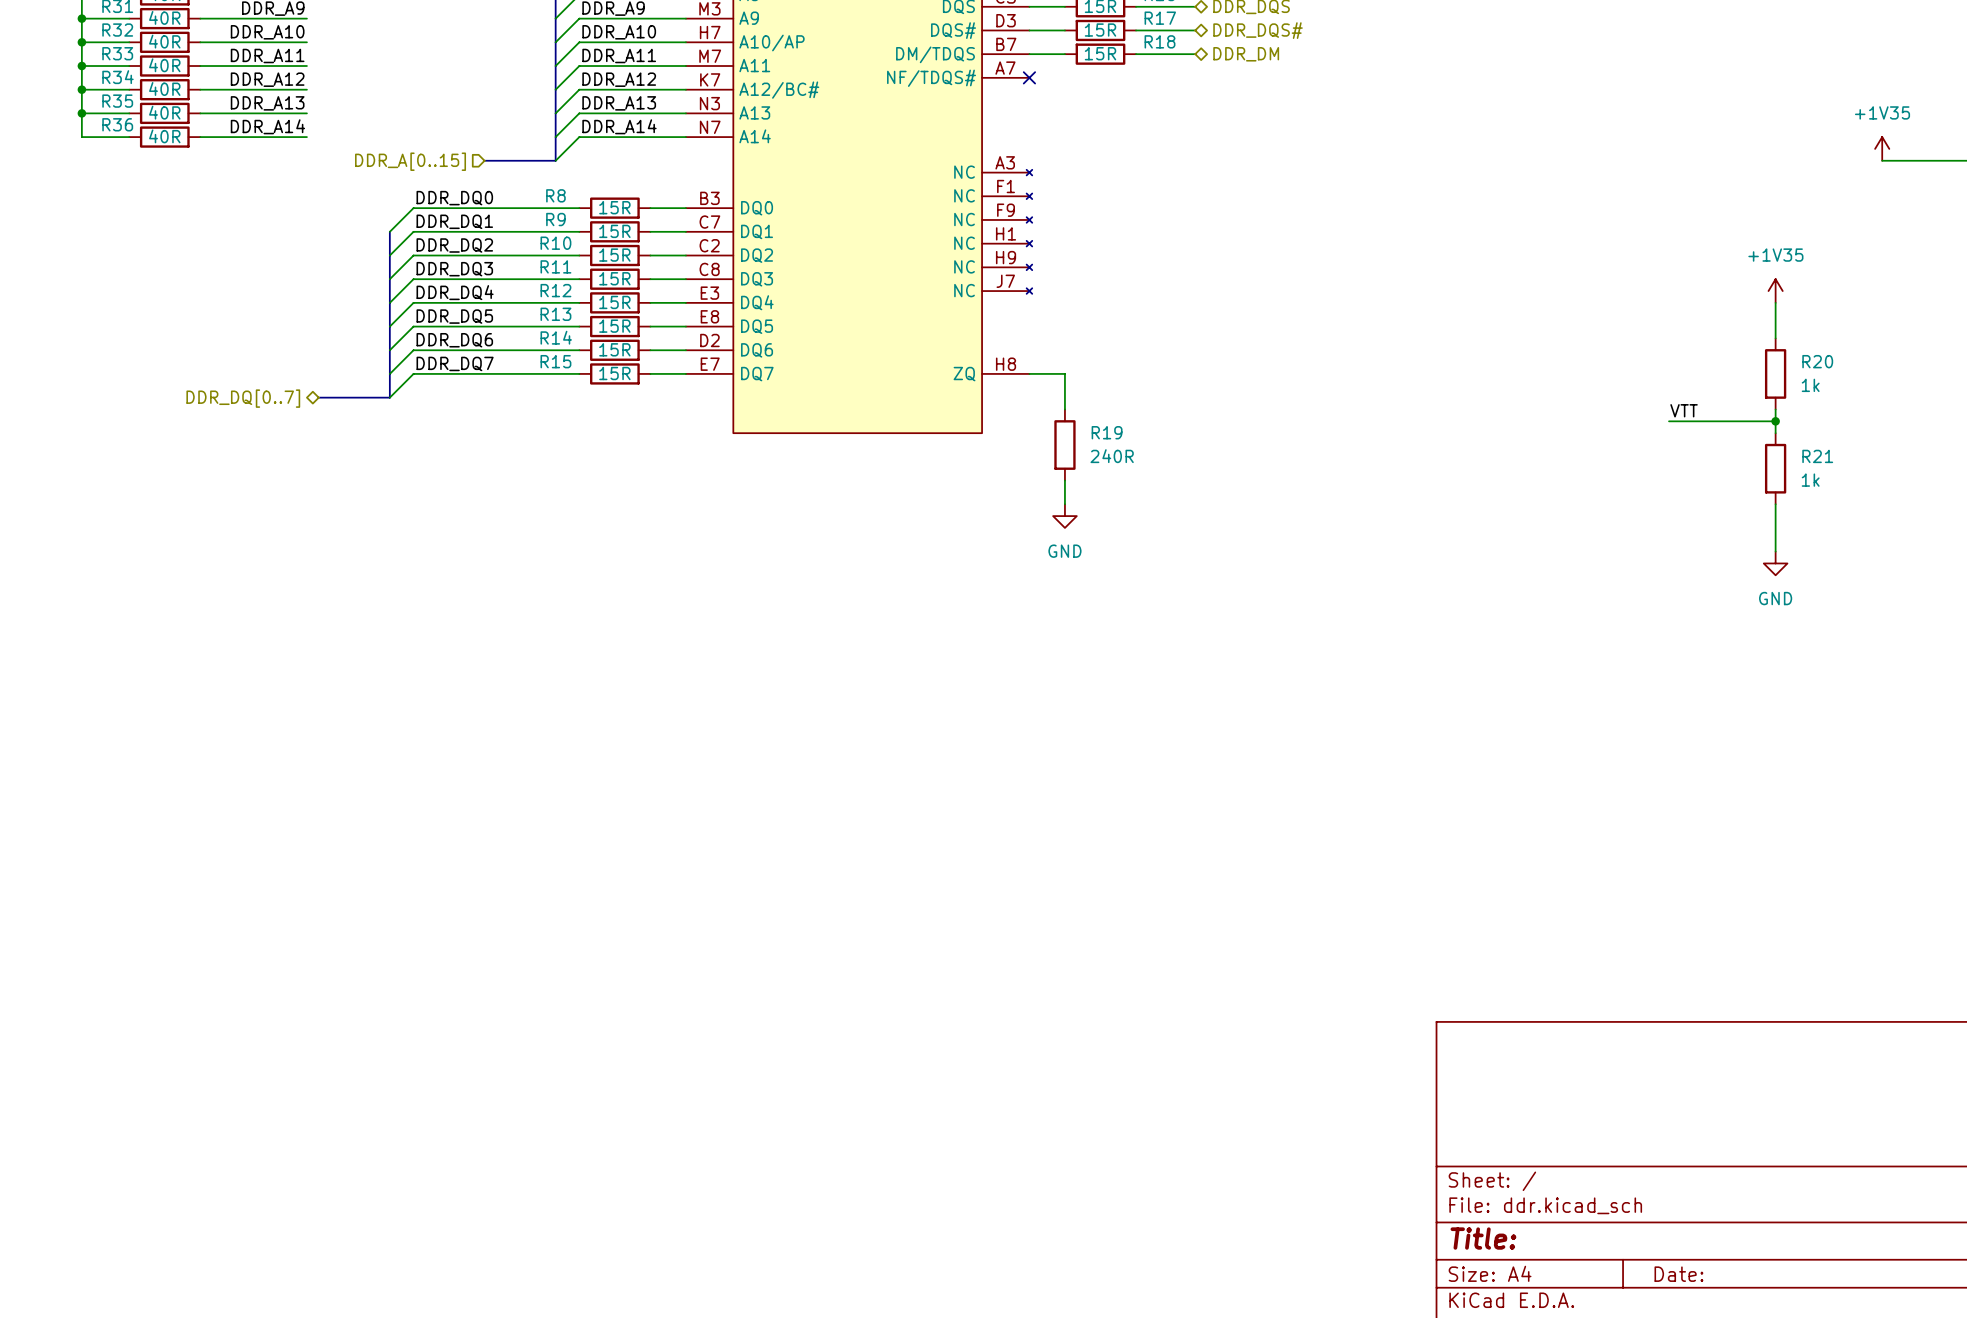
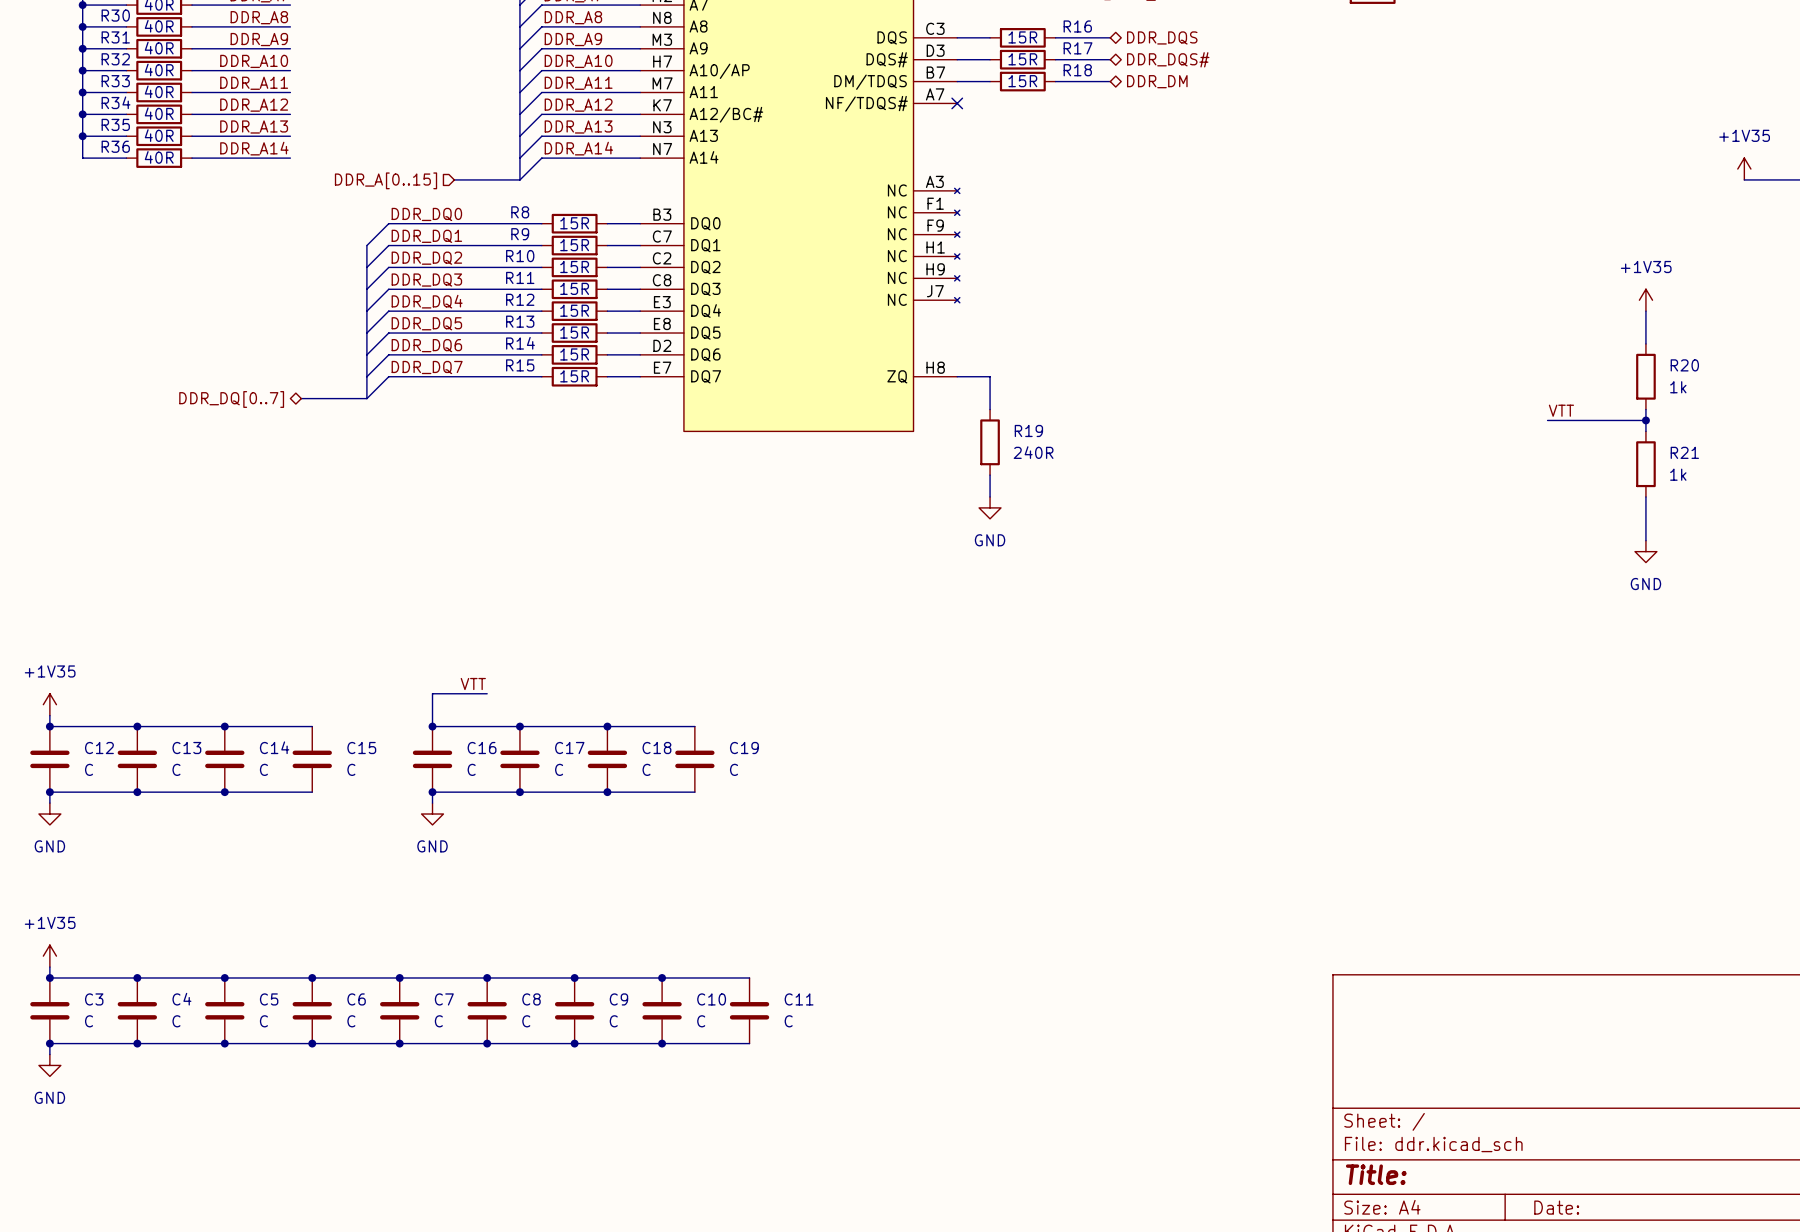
label: none -> VTT (473, 684)
wire: none -> (487, 693) (432, 693) (432, 726) (694, 726)
power symbol: none -> +1V35 (49, 704)
wire: none -> (49, 715) (49, 726) (312, 726)
junction: none -> (49, 726)
junction: none -> (137, 726)
junction: none -> (224, 726)
junction: none -> (432, 726)
junction: none -> (519, 726)
junction: none -> (607, 726)
C12: none -> C (49, 759)
C13: none -> C (137, 759)
C14: none -> C (224, 759)
C15: none -> C (312, 759)
C16: none -> C (432, 759)
C17: none -> C (519, 759)
C18: none -> C (607, 759)
C19: none -> C (694, 759)
junction: none -> (49, 792)
junction: none -> (137, 792)
junction: none -> (224, 792)
wire: none -> (312, 792) (49, 792) (49, 803)
junction: none -> (432, 792)
junction: none -> (519, 792)
junction: none -> (607, 792)
wire: none -> (694, 792) (432, 792) (432, 803)
power symbol: none -> GND (49, 814)
power symbol: none -> GND (432, 814)
power symbol: none -> +1V35 (49, 956)
wire: none -> (49, 967) (49, 977) (749, 977)
junction: none -> (49, 977)
junction: none -> (137, 977)
junction: none -> (224, 977)
junction: none -> (312, 977)
junction: none -> (399, 977)
junction: none -> (487, 977)
junction: none -> (574, 977)
junction: none -> (662, 977)
C3: none -> C (49, 1010)
C4: none -> C (137, 1010)
C5: none -> C (224, 1010)
C6: none -> C (312, 1010)
C7: none -> C (399, 1010)
C8: none -> C (487, 1010)
C9: none -> C (574, 1010)
C10: none -> C (662, 1010)
C11: none -> C (749, 1010)
junction: none -> (49, 1043)
junction: none -> (137, 1043)
junction: none -> (224, 1043)
junction: none -> (312, 1043)
junction: none -> (399, 1043)
junction: none -> (487, 1043)
junction: none -> (574, 1043)
junction: none -> (662, 1043)
wire: none -> (749, 1043) (49, 1043) (49, 1054)
power symbol: none -> GND (49, 1065)

